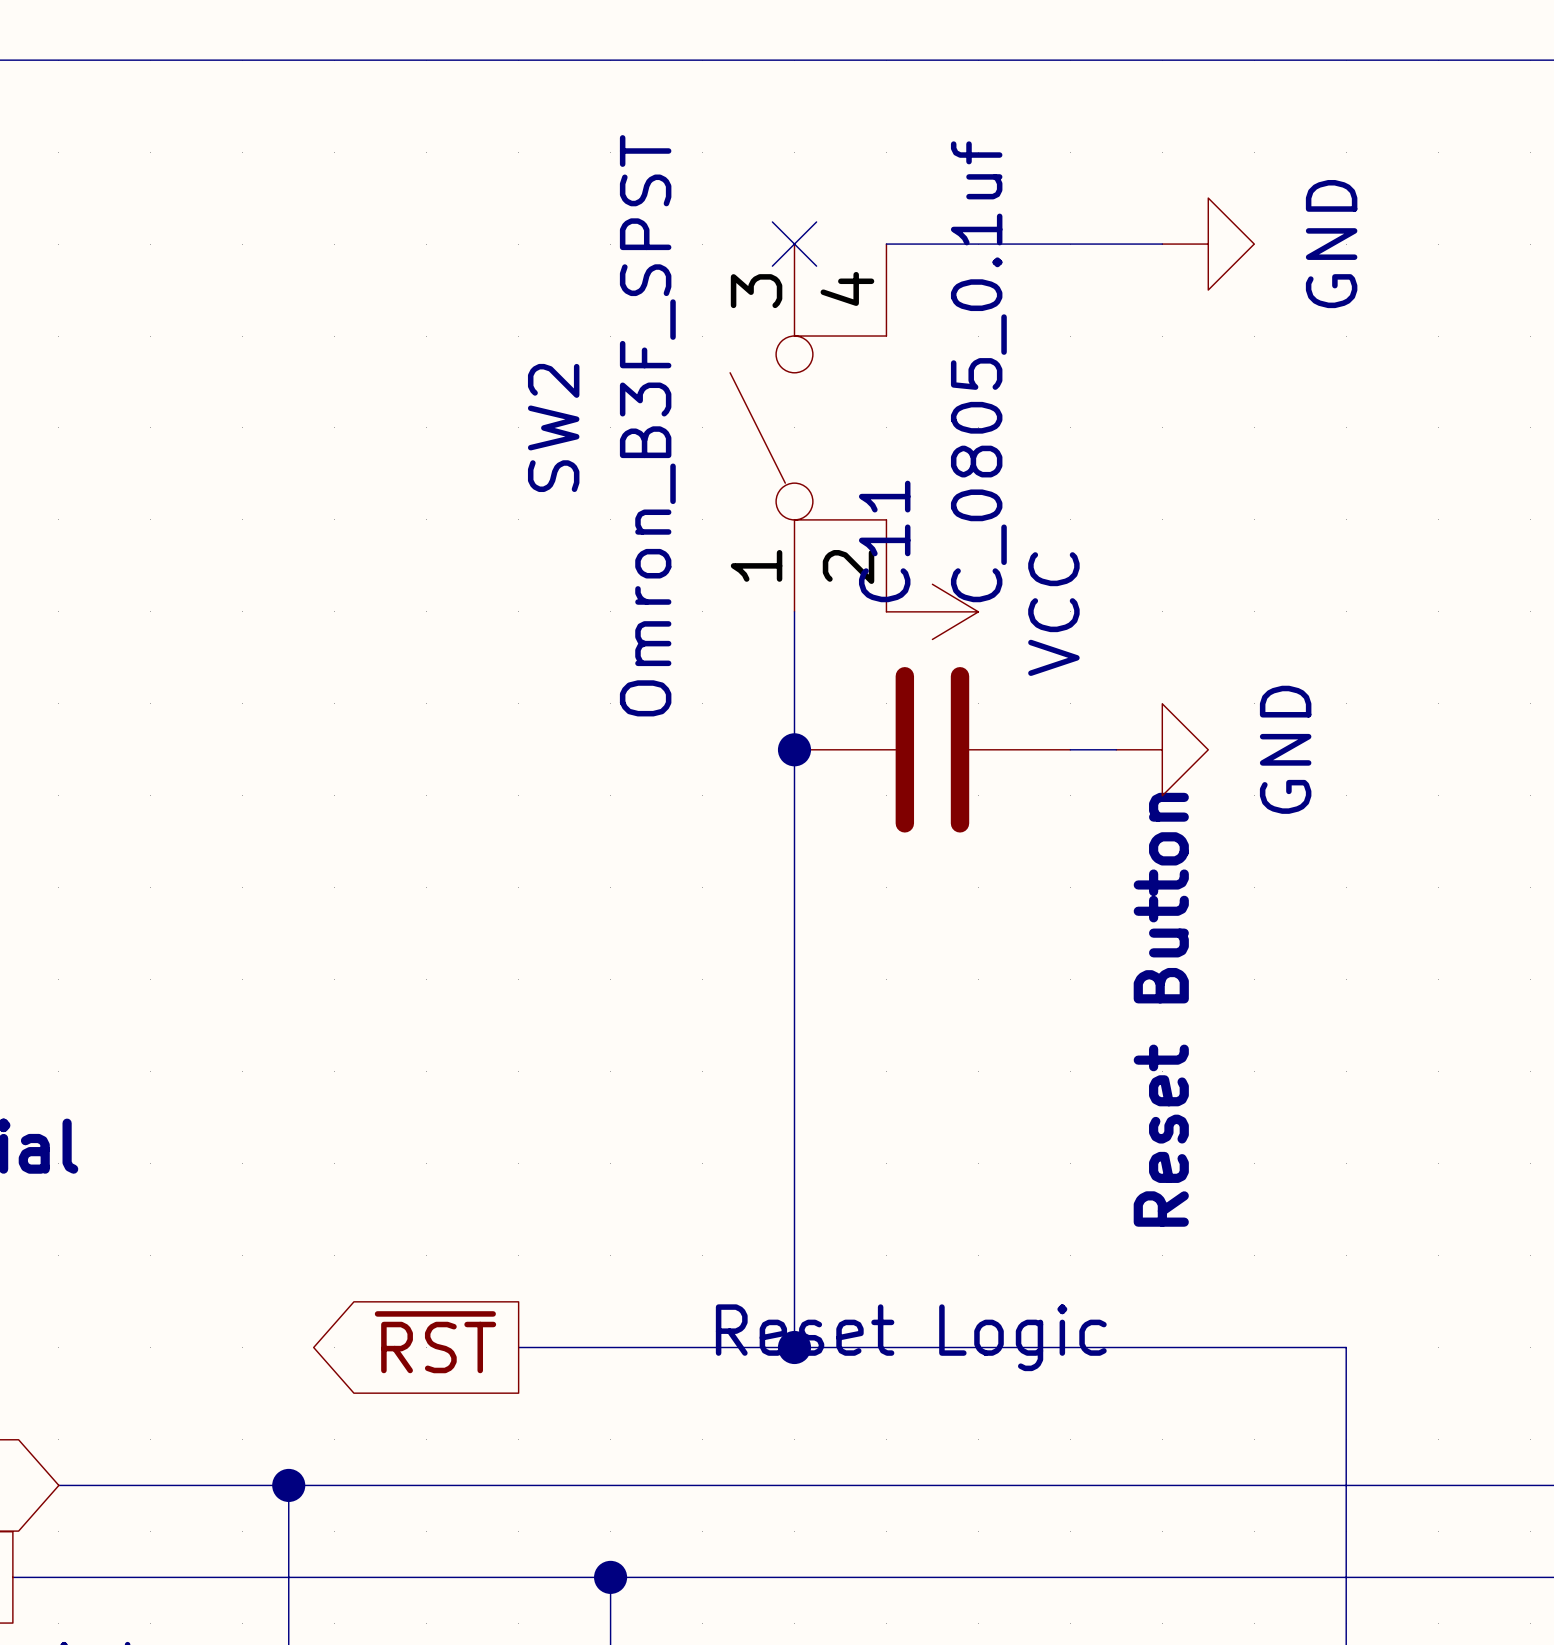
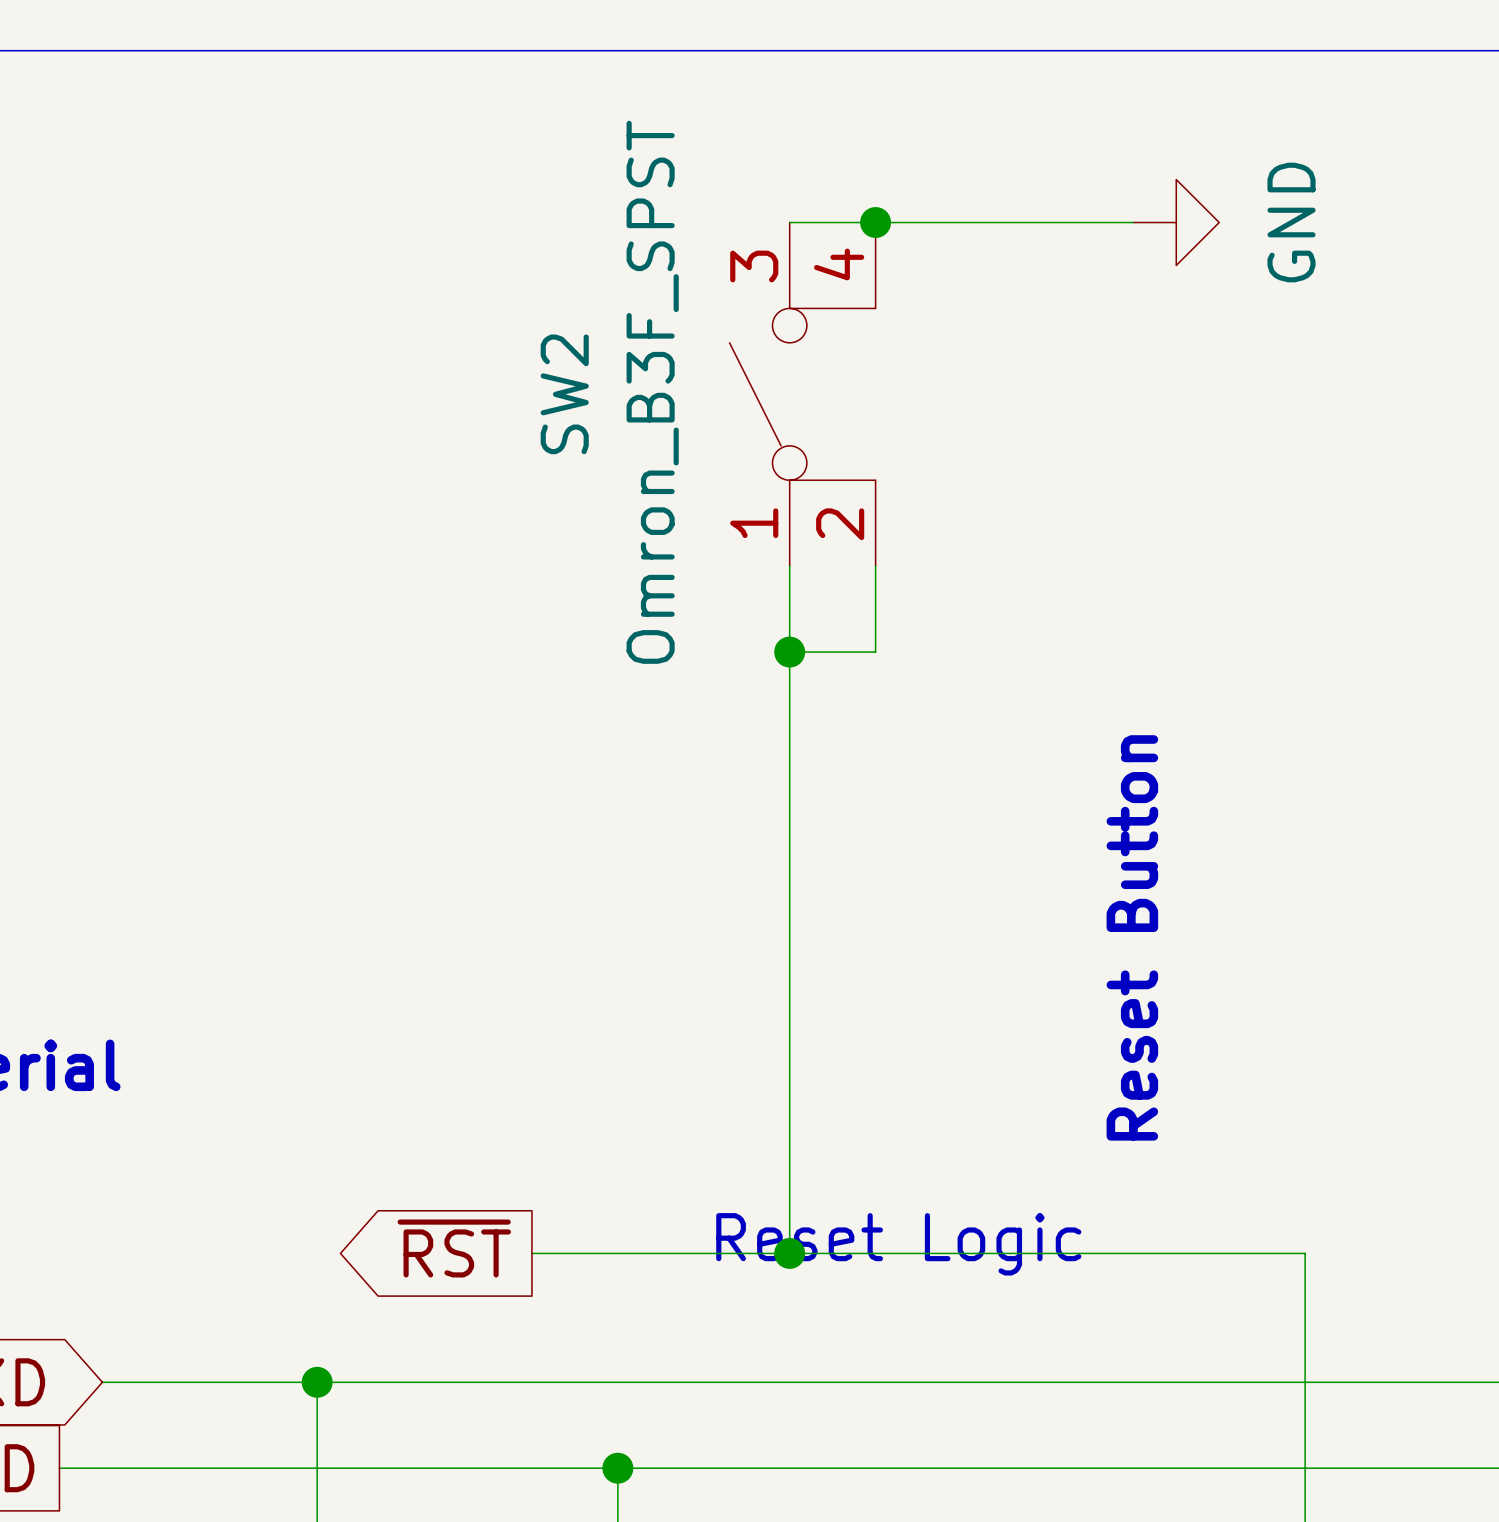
wire: none -> (789, 222) (875, 222)
no-connect mark: (794, 244) -> none
junction: none -> (875, 222)
wire: none -> (875, 566) (875, 652) (789, 652)
power symbol: VCC (932, 611) -> none
junction position: (794, 749) -> (789, 652)
C11: C_0805_0.1uf (932, 749) -> none
wire: (1070, 749) (1116, 749) -> none
power symbol: GND (1162, 749) -> none

